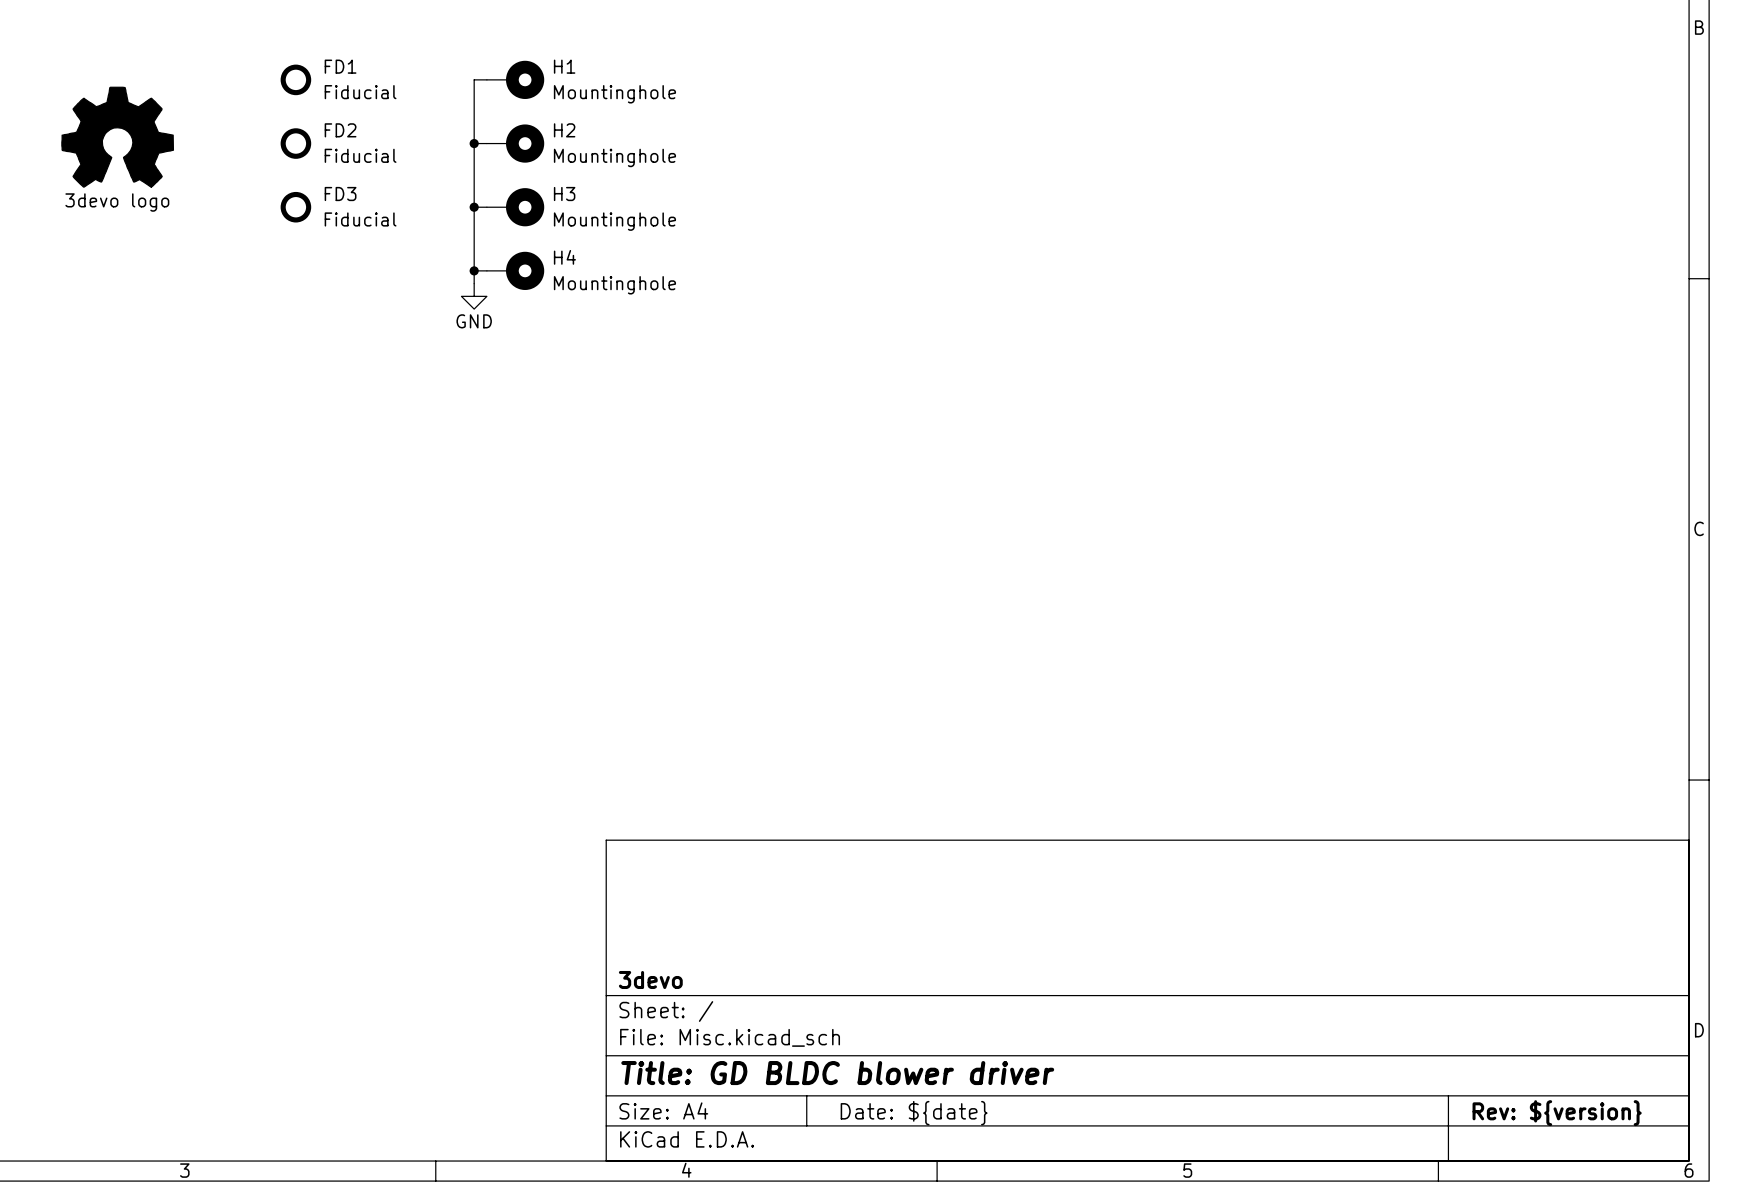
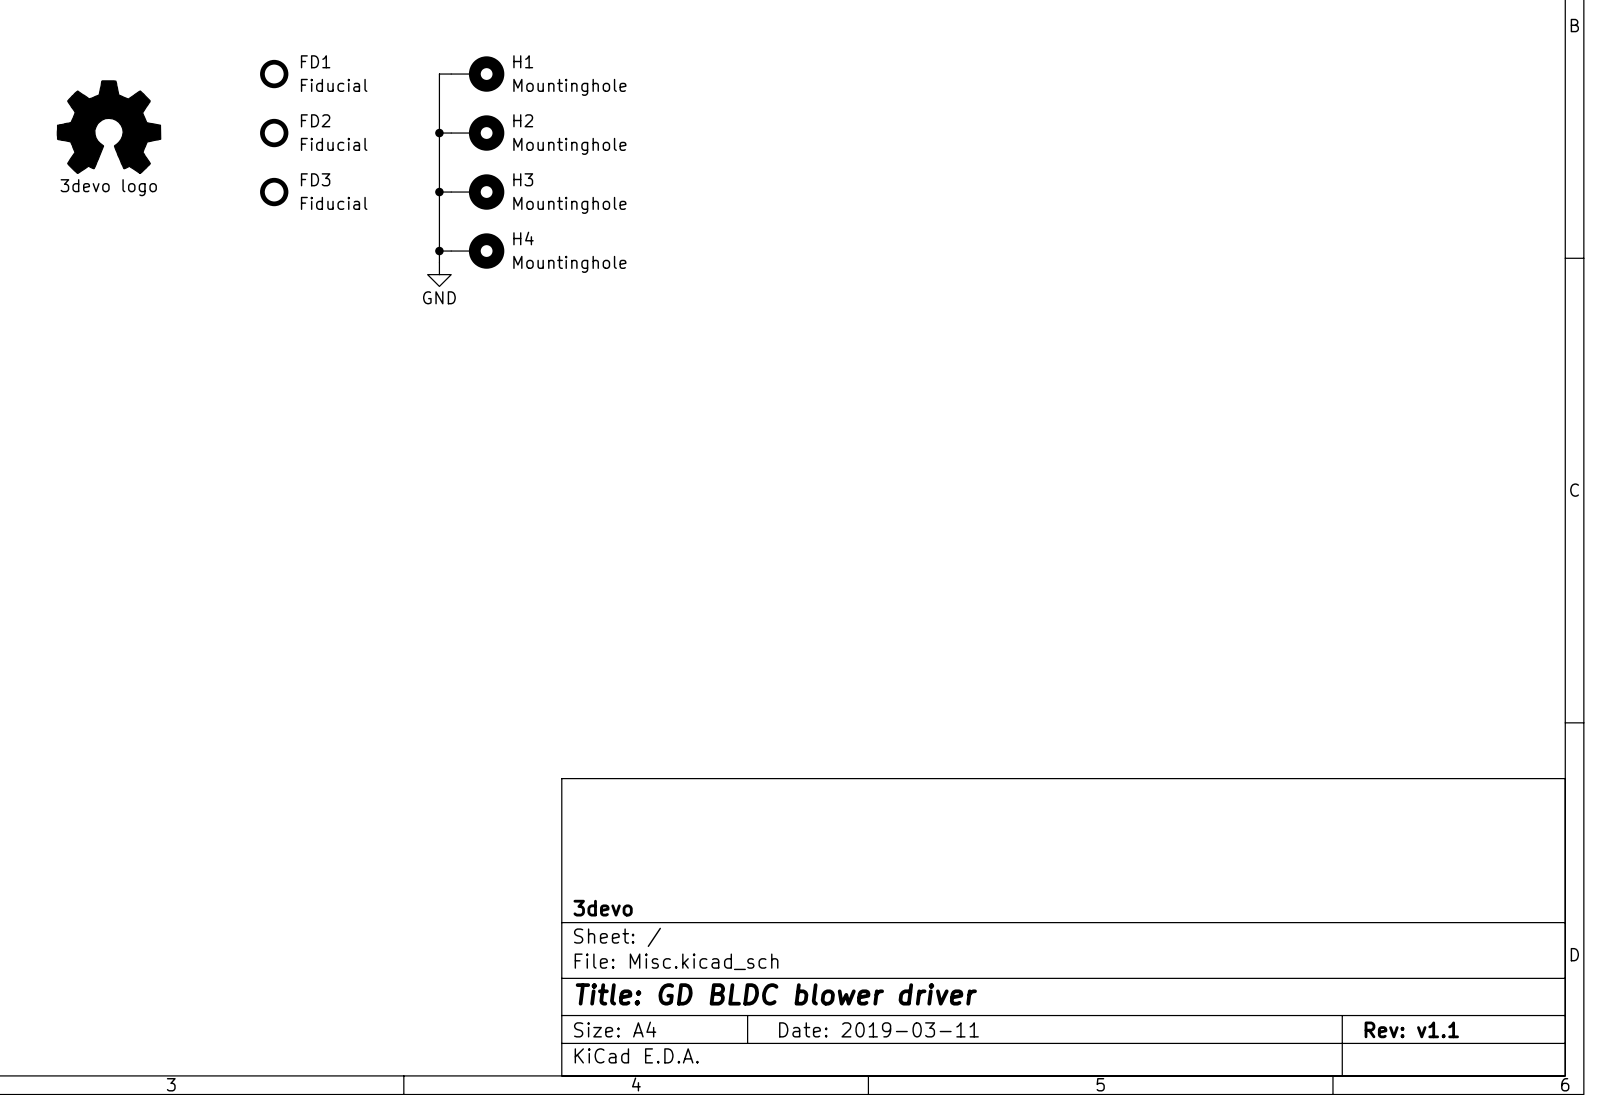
title block: Date: ${date} (914, 1113) -> Date: 2019-03-11 (878, 1029)
title block: Rev: ${version} (1557, 1113) -> Rev: v1.1 (1411, 1029)

